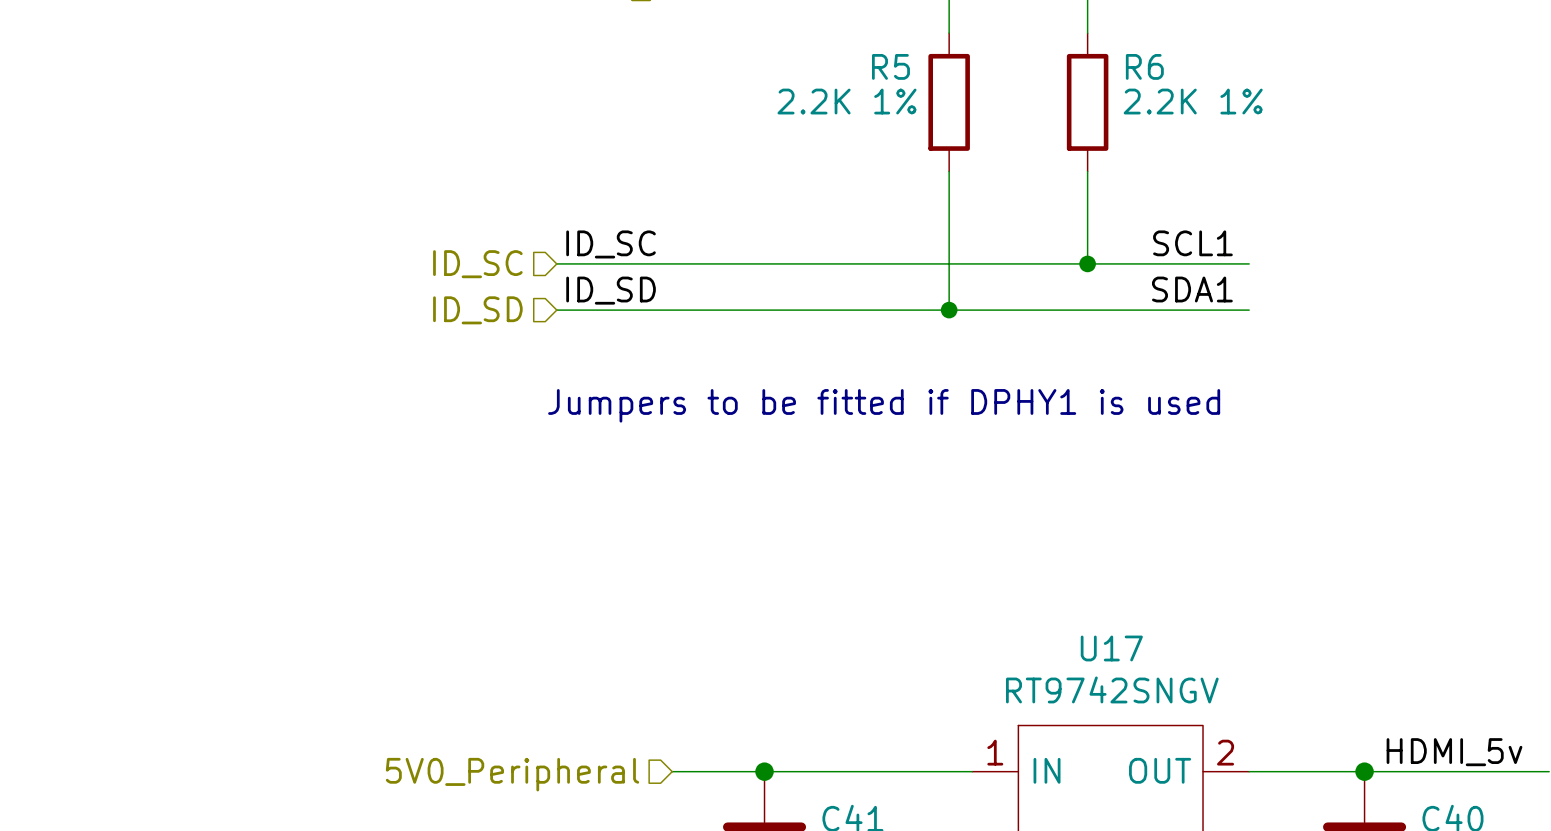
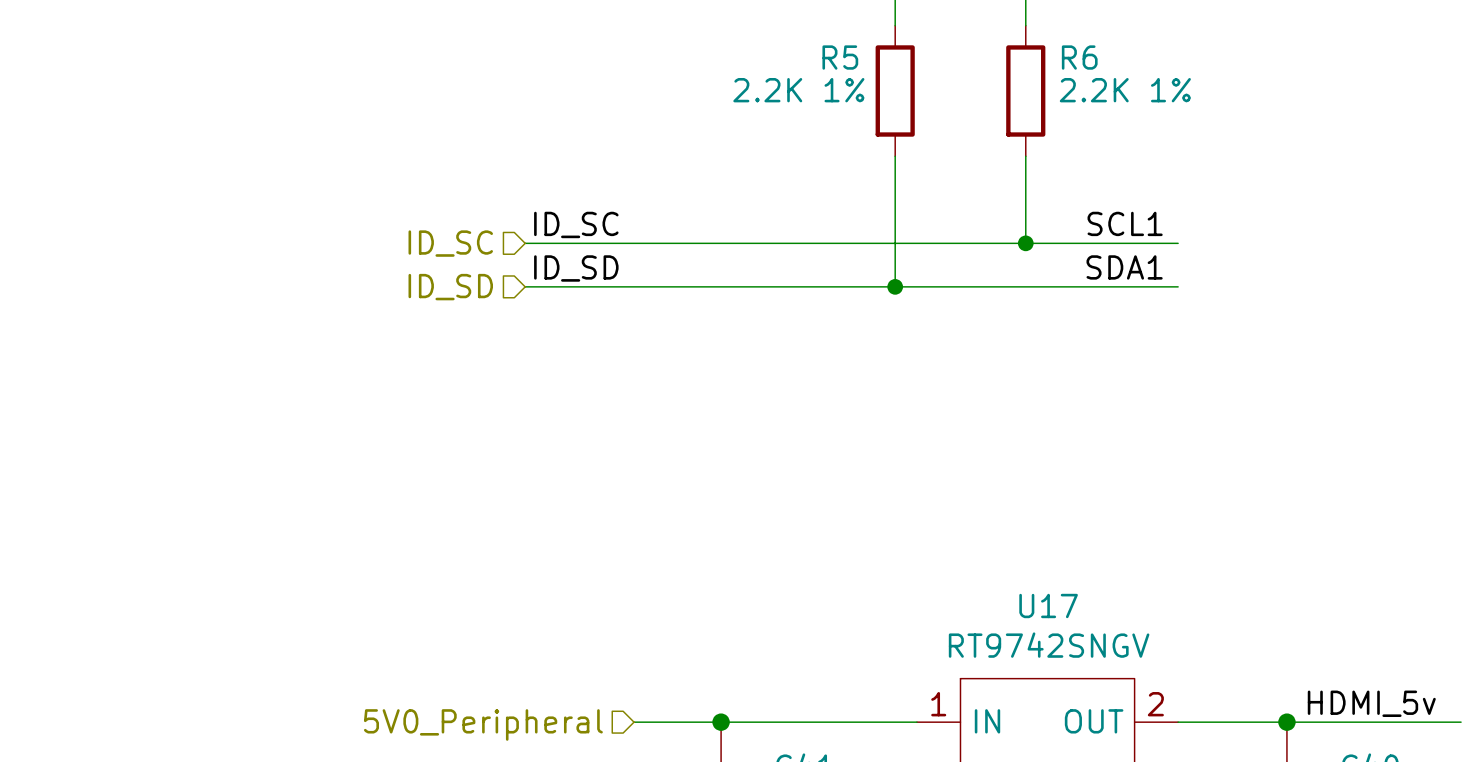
text: Jumpers to be fitted if DPHY1 is used (884, 405) -> none

